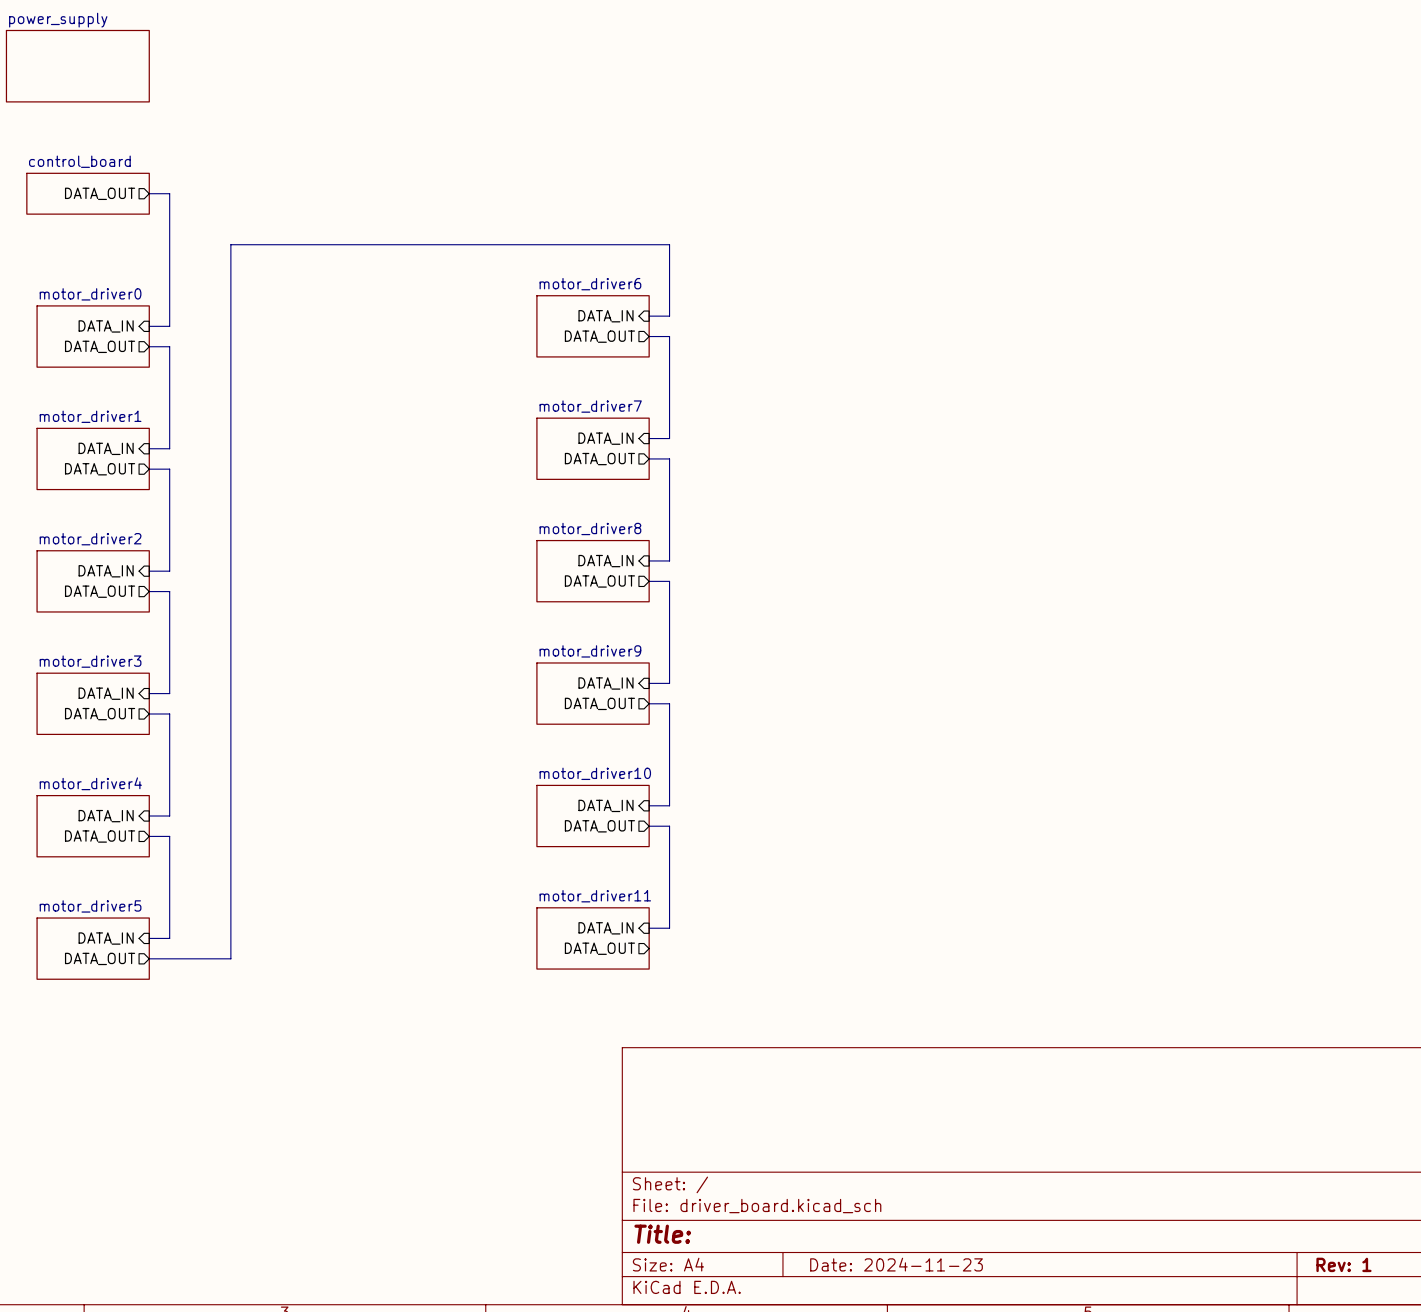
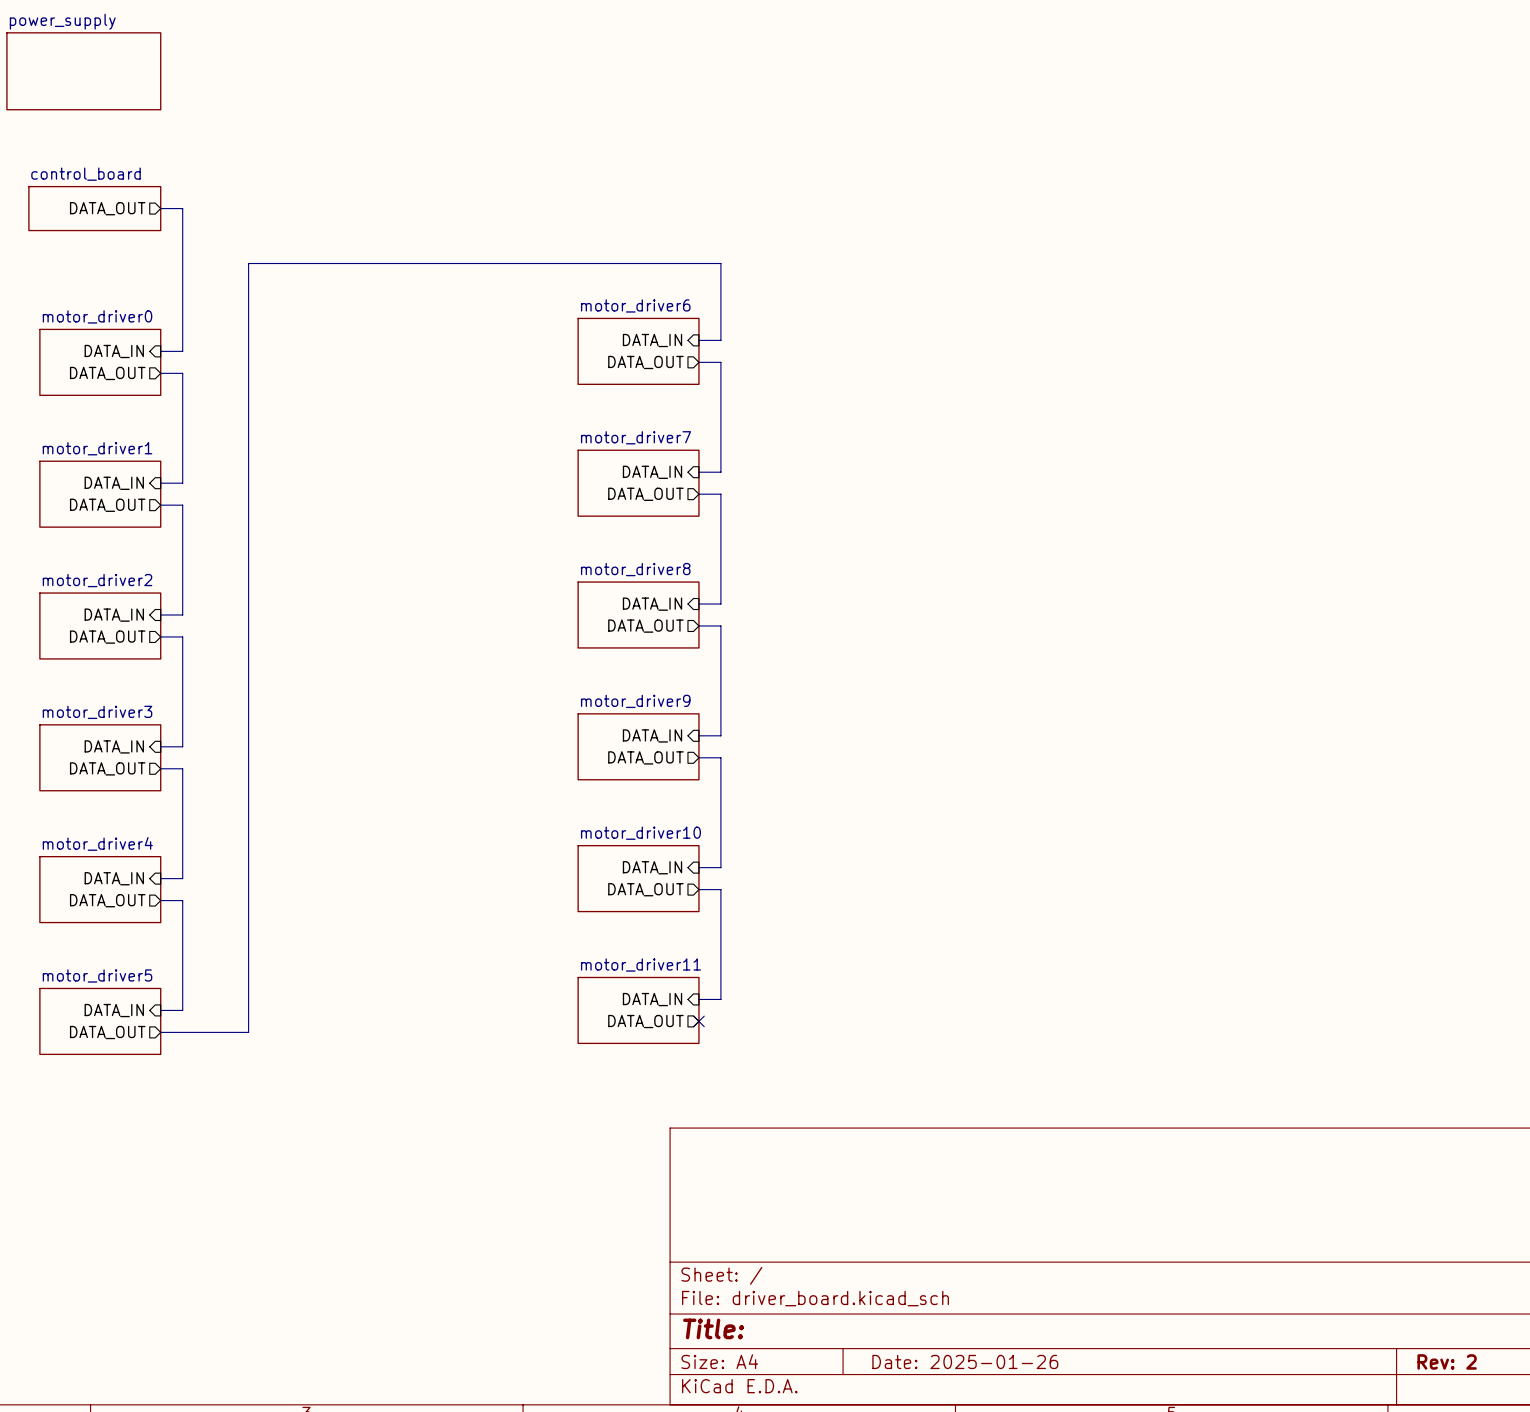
no-connect mark: none -> (698, 1021)
title block: Date: 2024-11-23 (896, 1264) -> Date: 2025-01-26 (965, 1361)
title block: Rev: 1 (1343, 1264) -> Rev: 2 (1447, 1361)

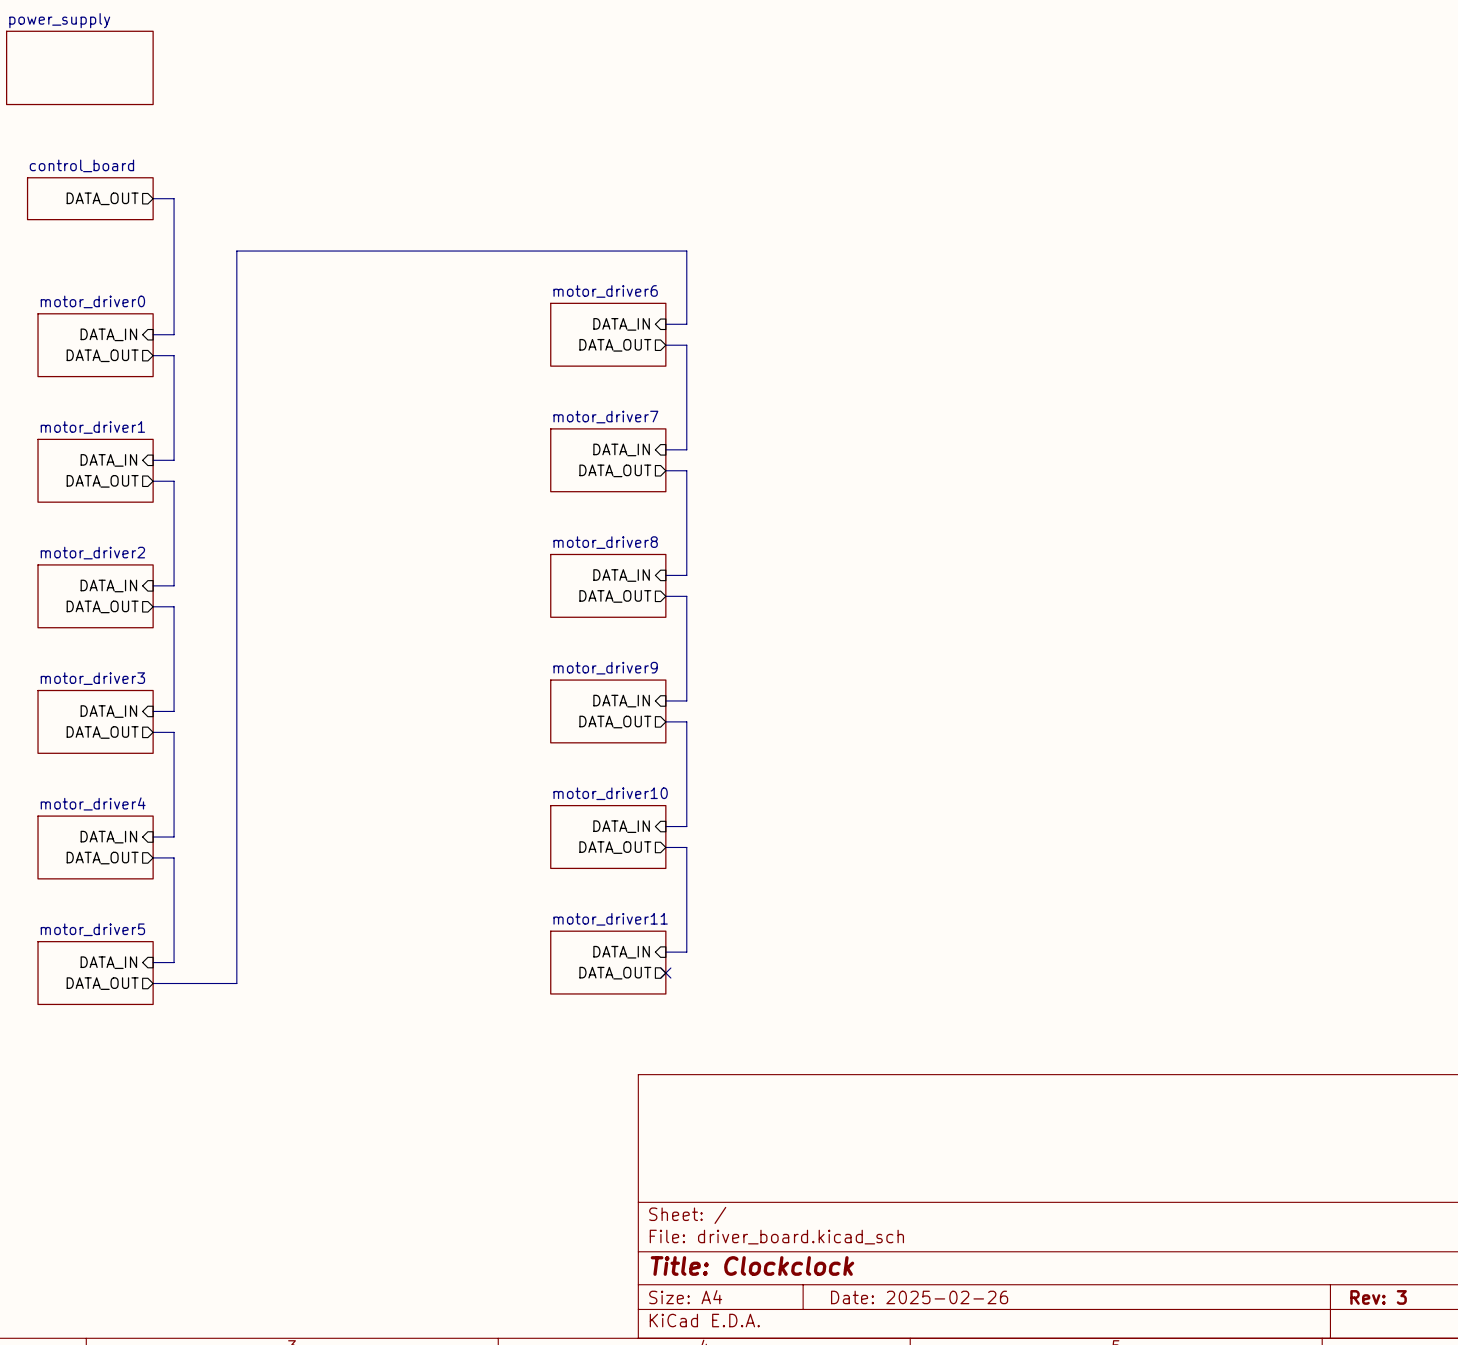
title block: Title: (713, 1328) -> Title: Clockclock (752, 1265)
title block: Date: 2025-01-26 (965, 1361) -> Date: 2025-02-26 (919, 1297)
title block: Rev: 2 (1447, 1361) -> Rev: 3 (1378, 1297)

